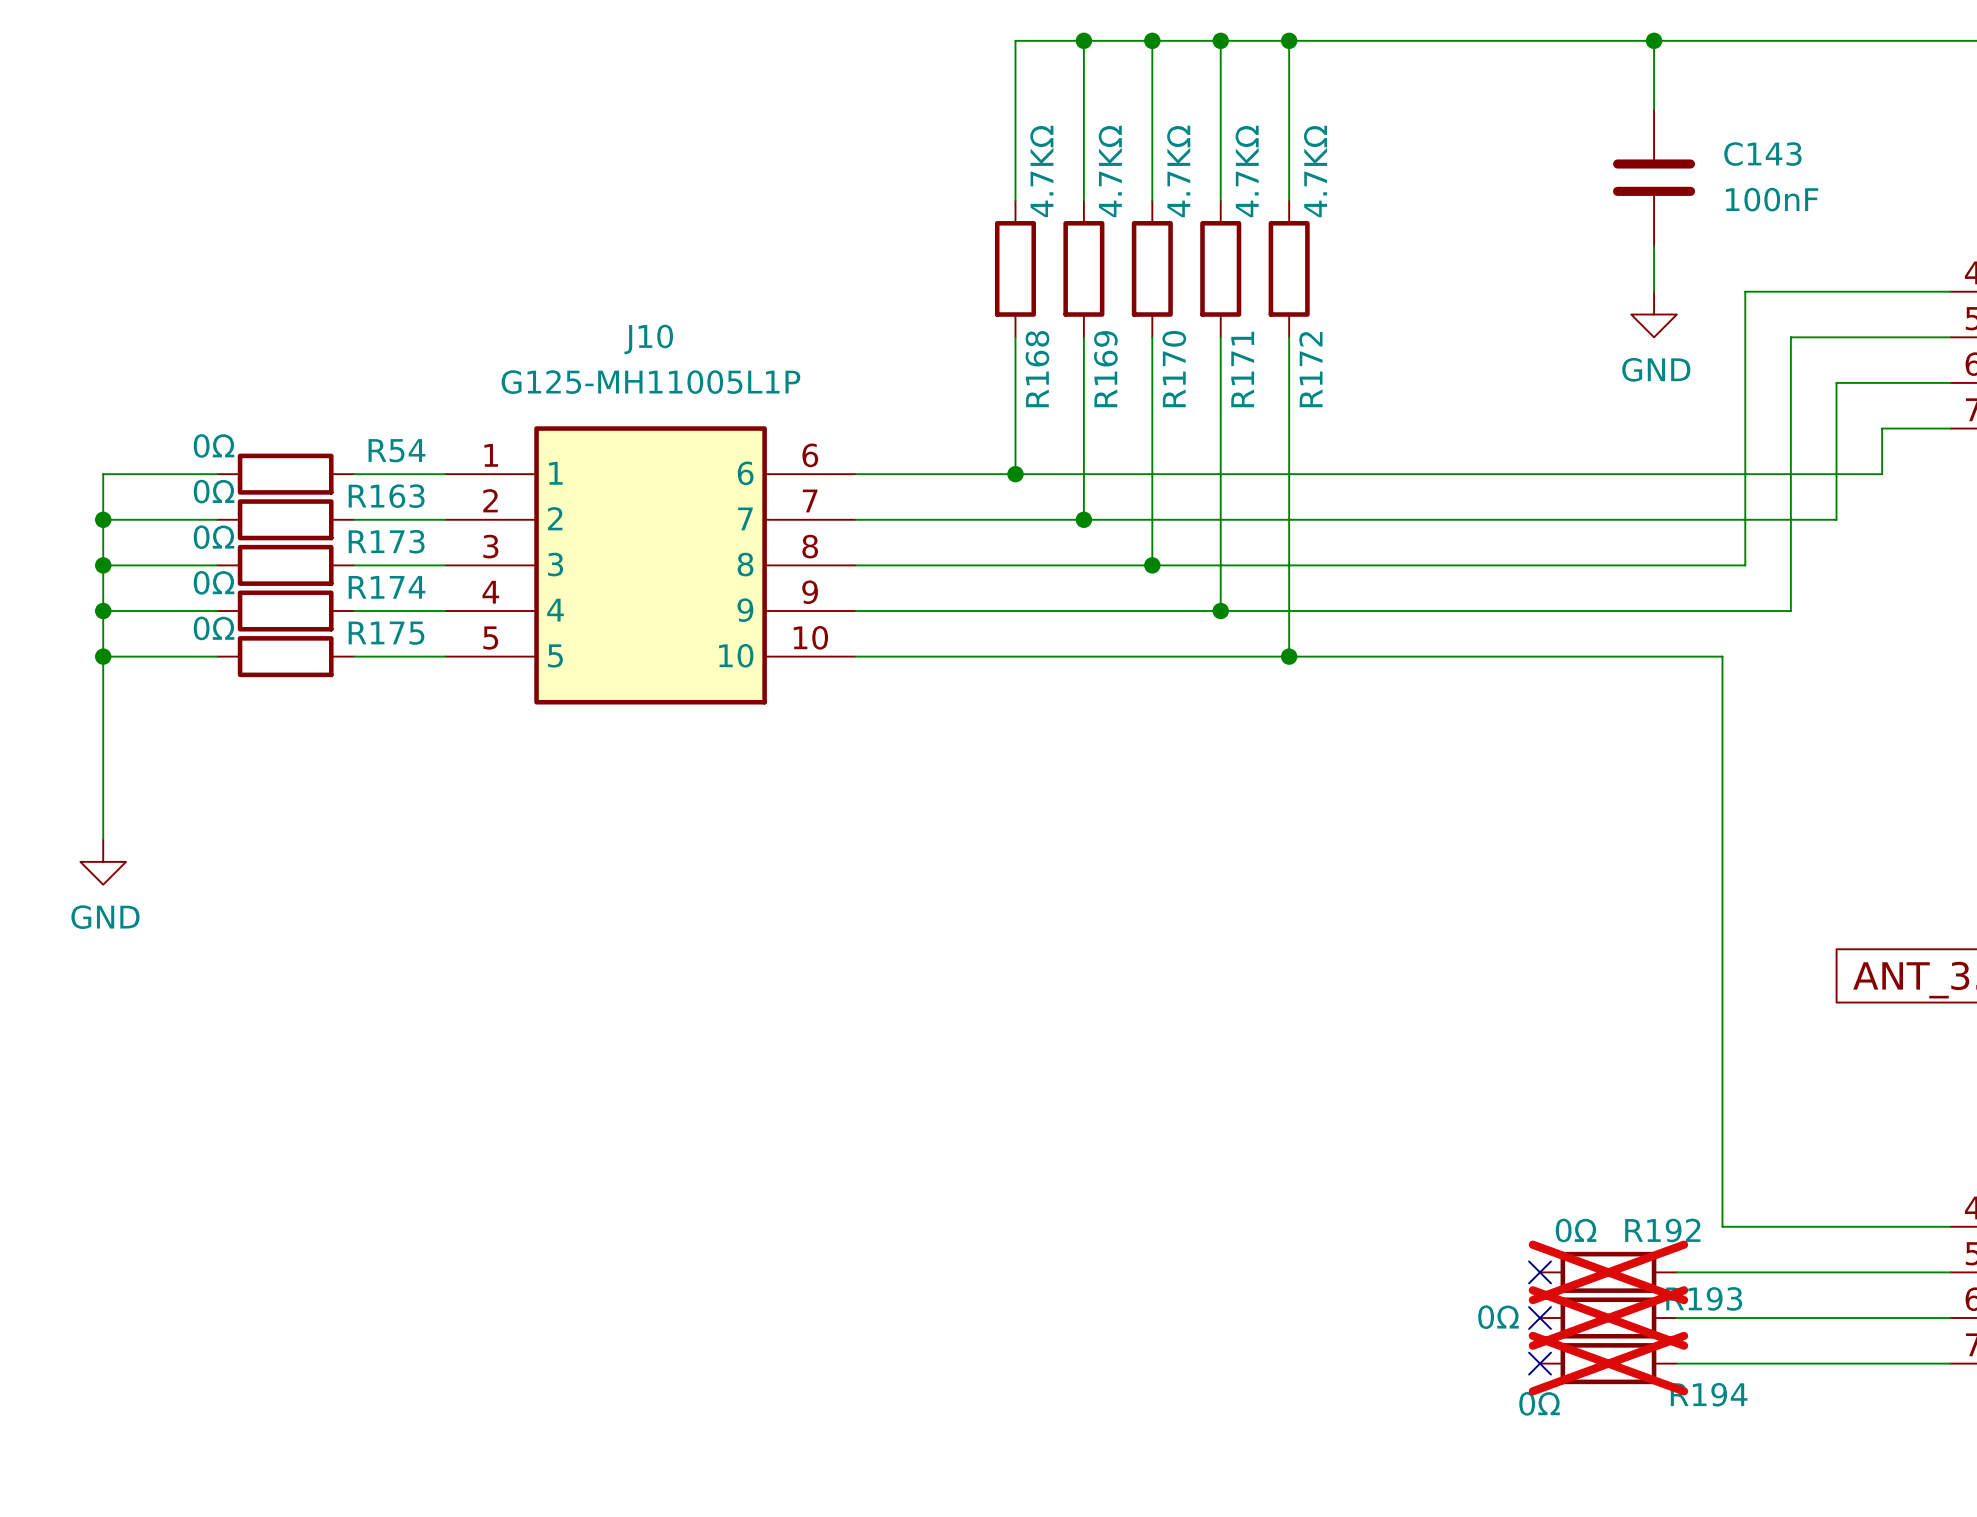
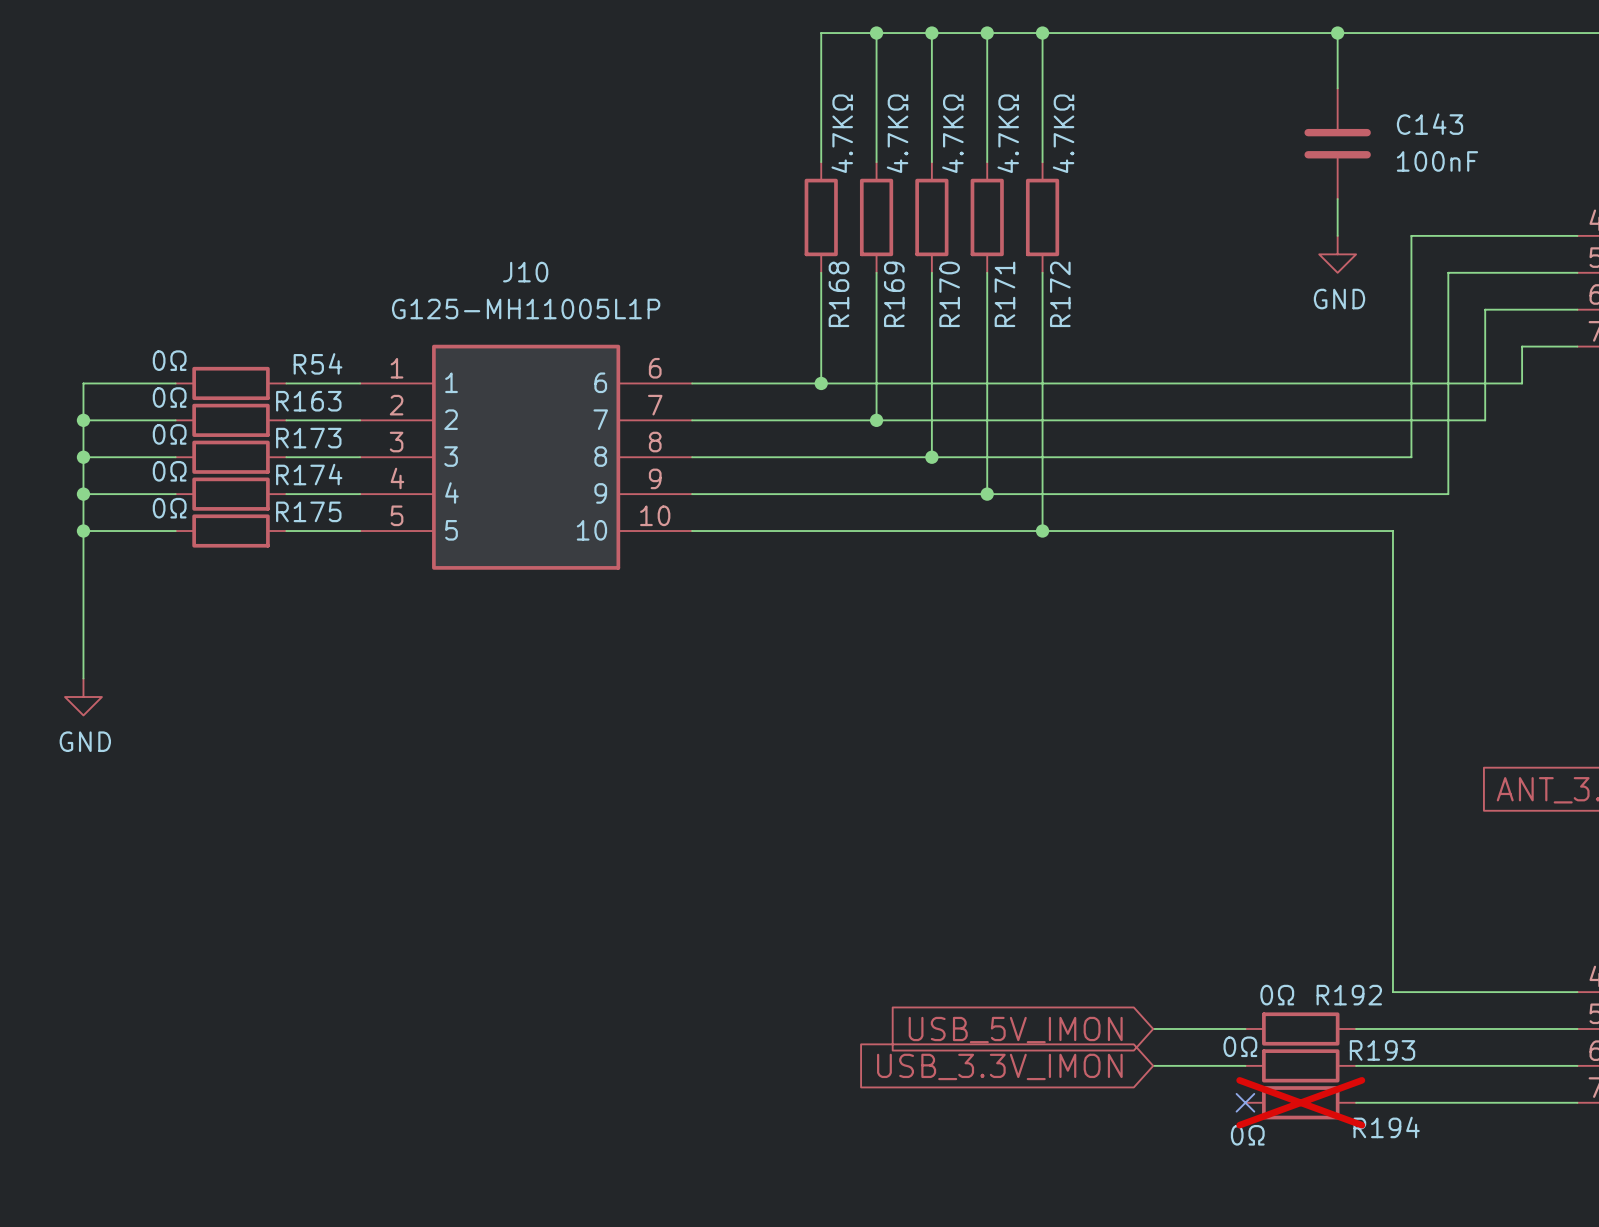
wire: none -> (1153, 1029) (1245, 1029)
no-connect mark: (1540, 1272) -> none
R192 do-not-place cross: (1608, 1272) -> none
global label: none -> USB_5V_IMON (1015, 1030)
R193 value position: 0Ω (1498, 1317) -> 0Ω (1240, 1046)
wire: none -> (1153, 1065) (1245, 1065)
no-connect mark: (1540, 1318) -> none
R193 do-not-place cross: (1608, 1318) -> none
global label: none -> USB_3.3V_IMON (999, 1066)

